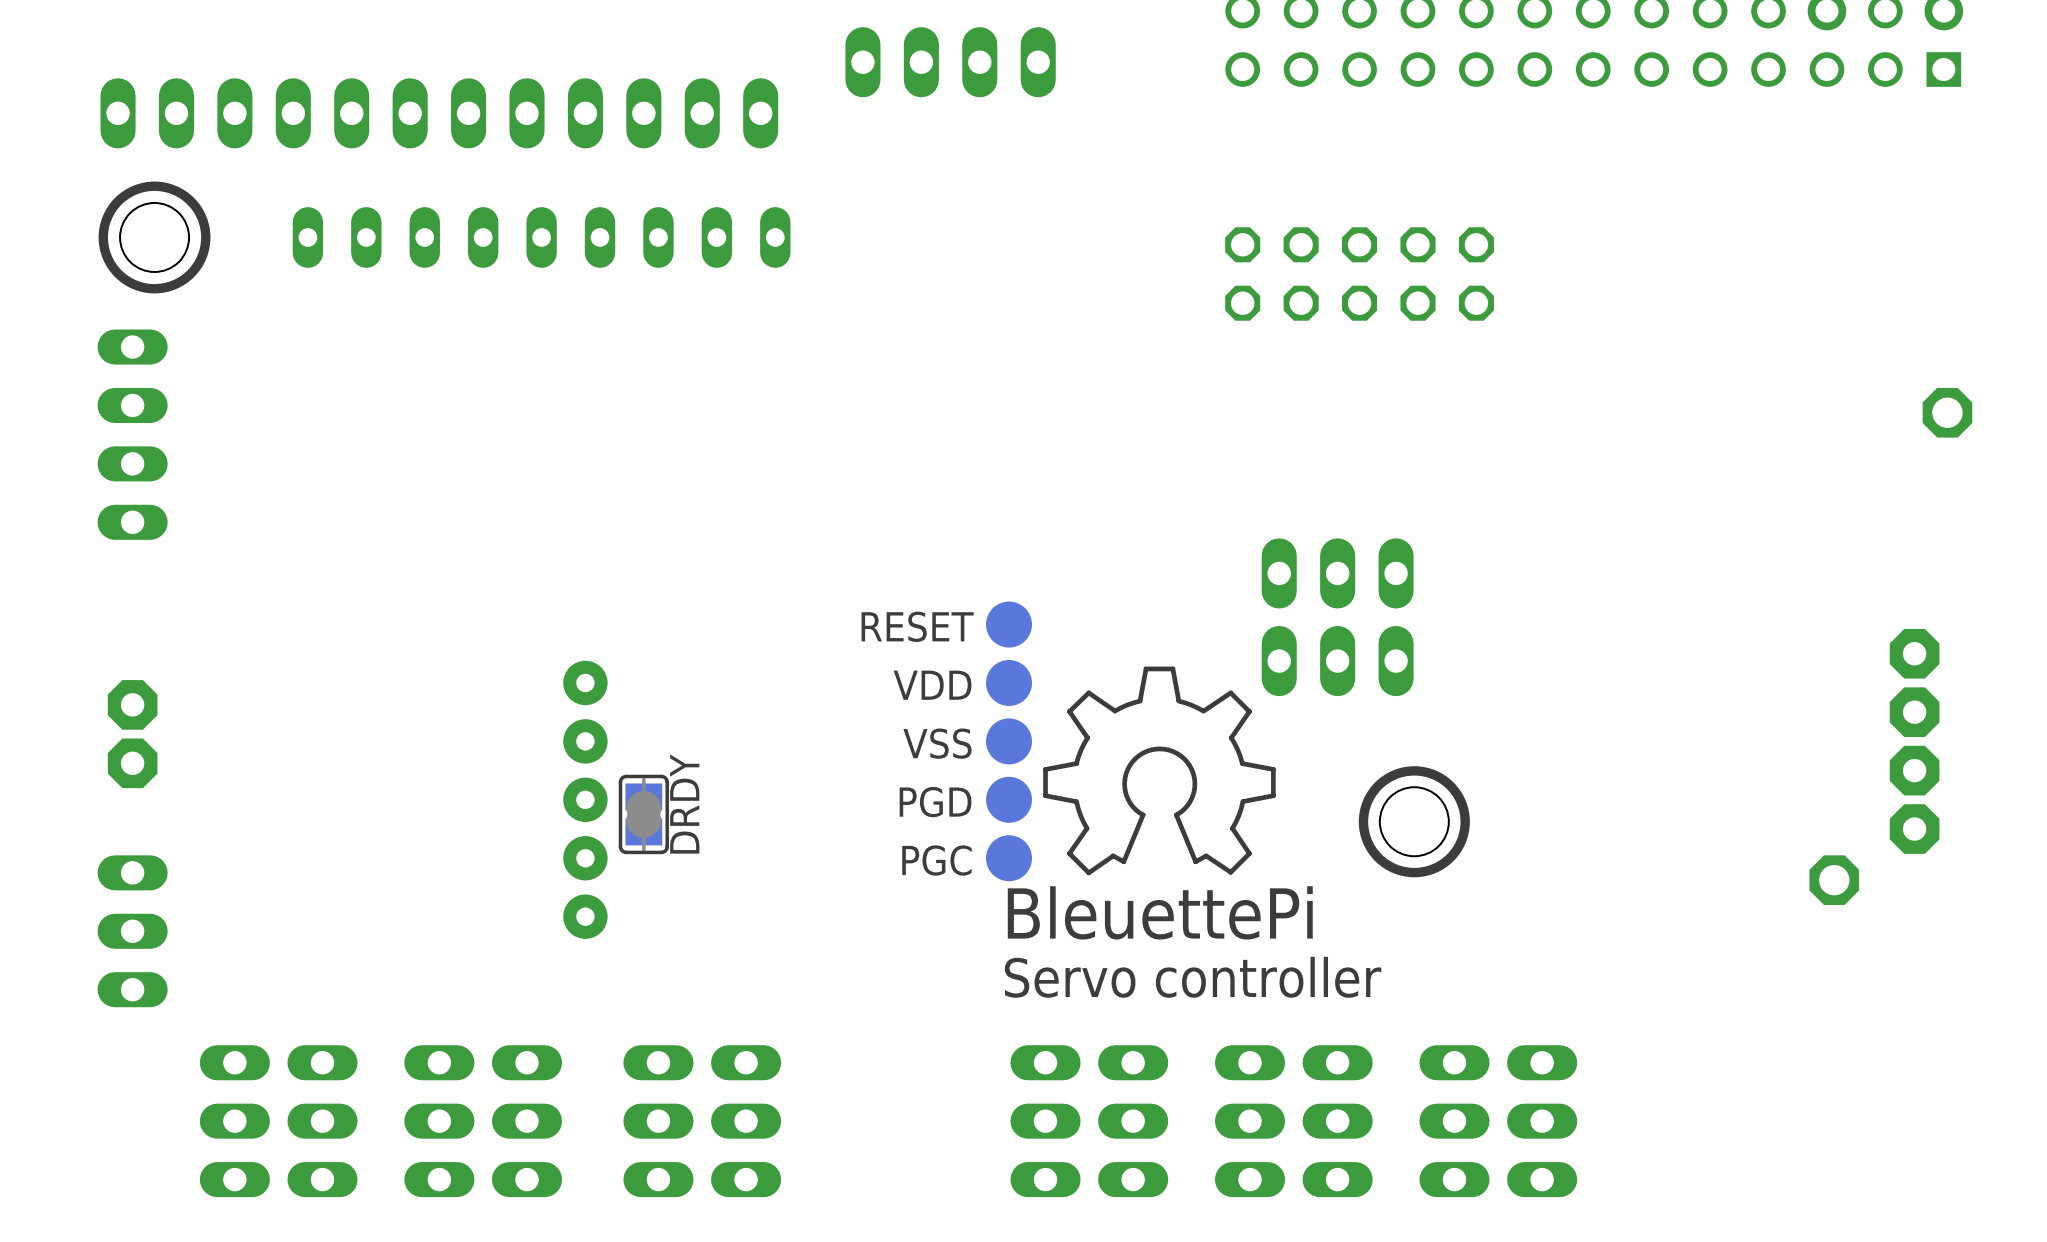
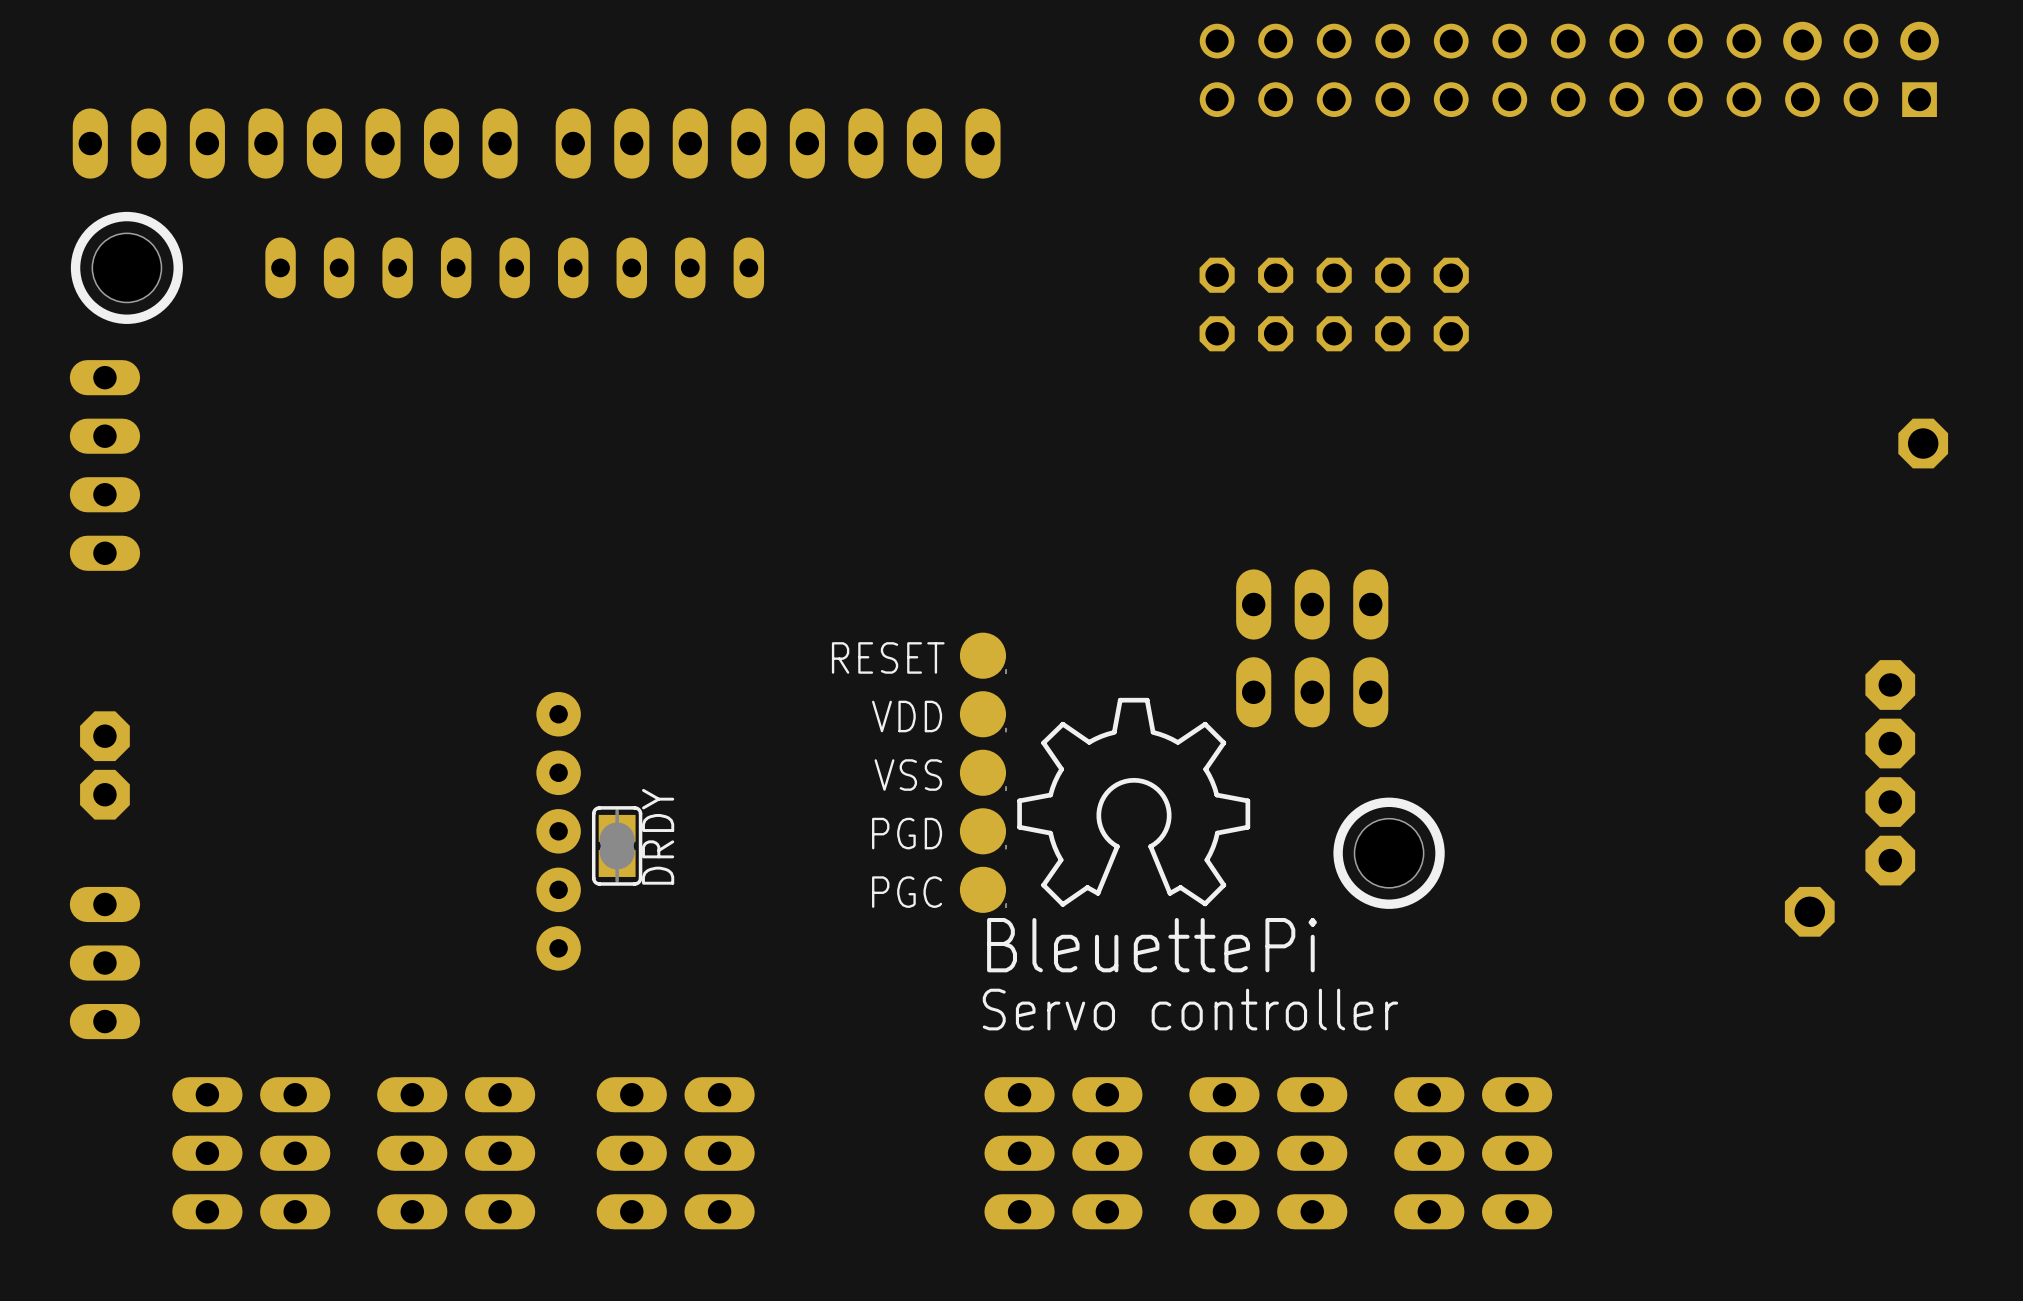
part: (950, 62) -> none
part: (614, 113) -> none
part: (731, 113) -> none
part: none -> (778, 143)

